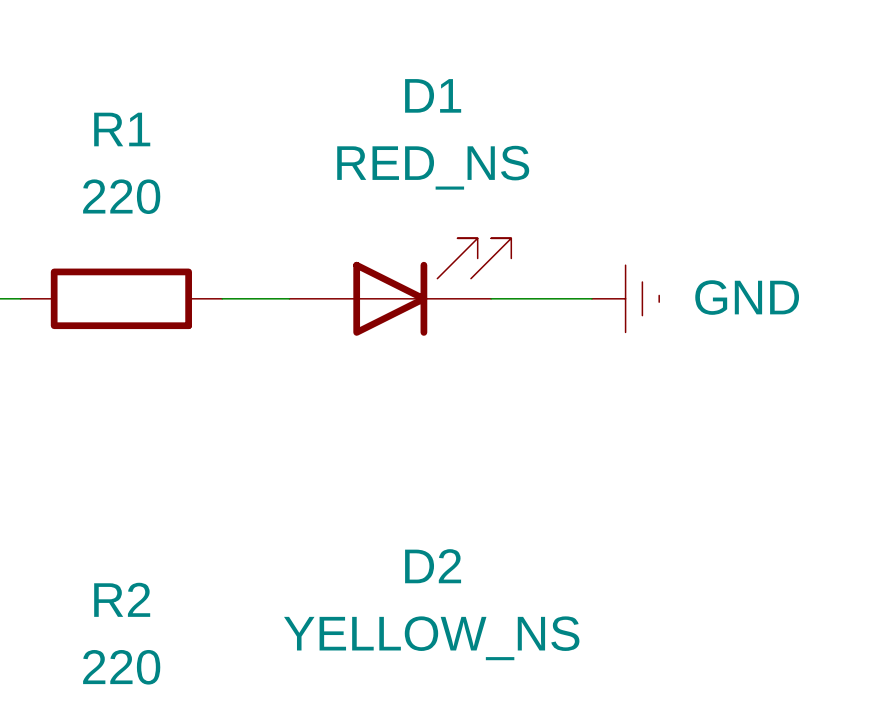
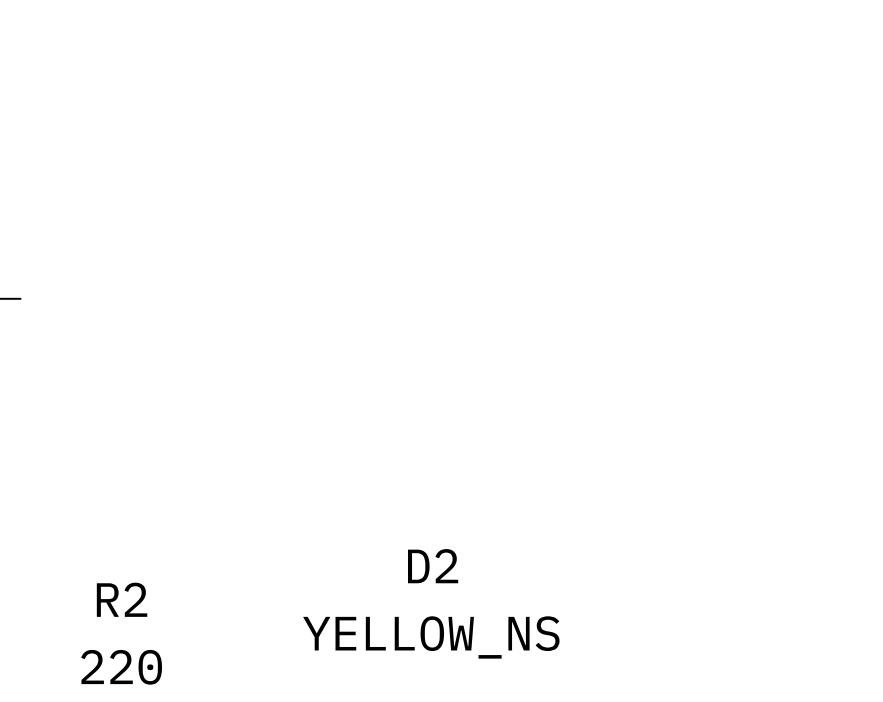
D1: RED_NS (400, 287) -> none
R1: 220 (121, 298) -> none
wire: (222, 298) (289, 298) -> none
wire: (491, 298) (591, 298) -> none
power symbol: GND (625, 298) -> none

